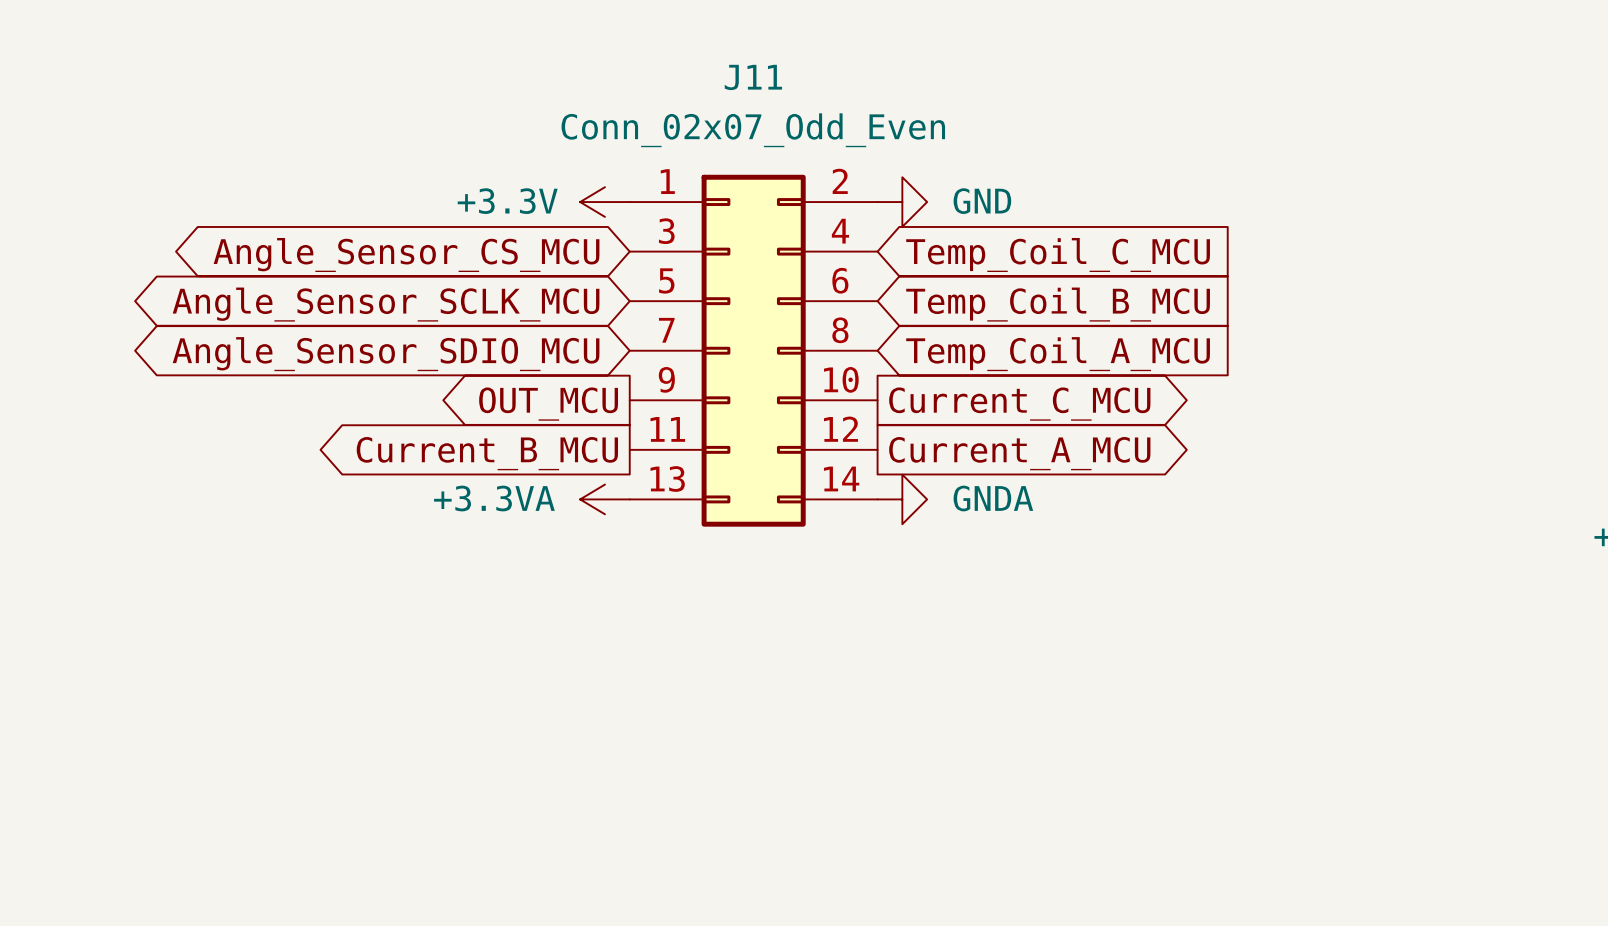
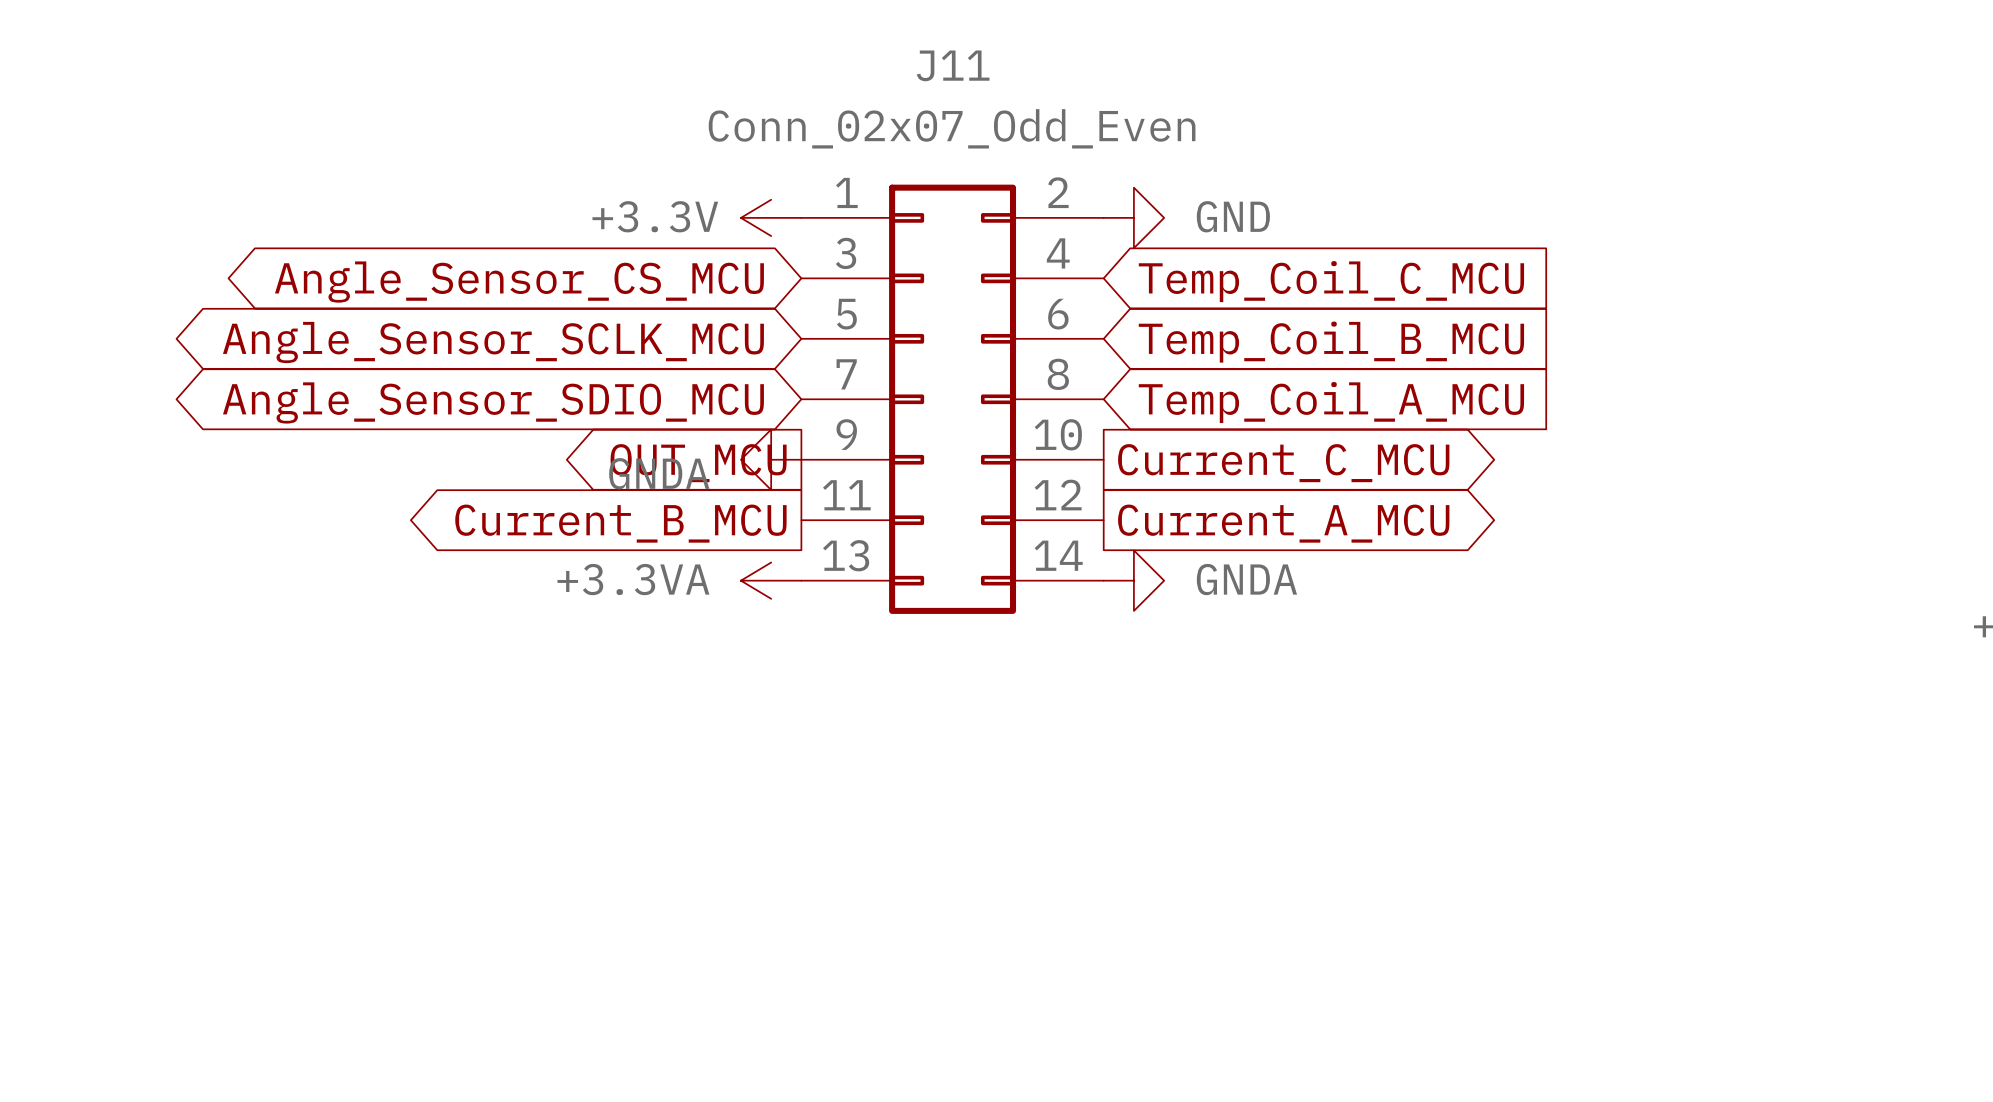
power symbol: none -> GNDA (771, 459)

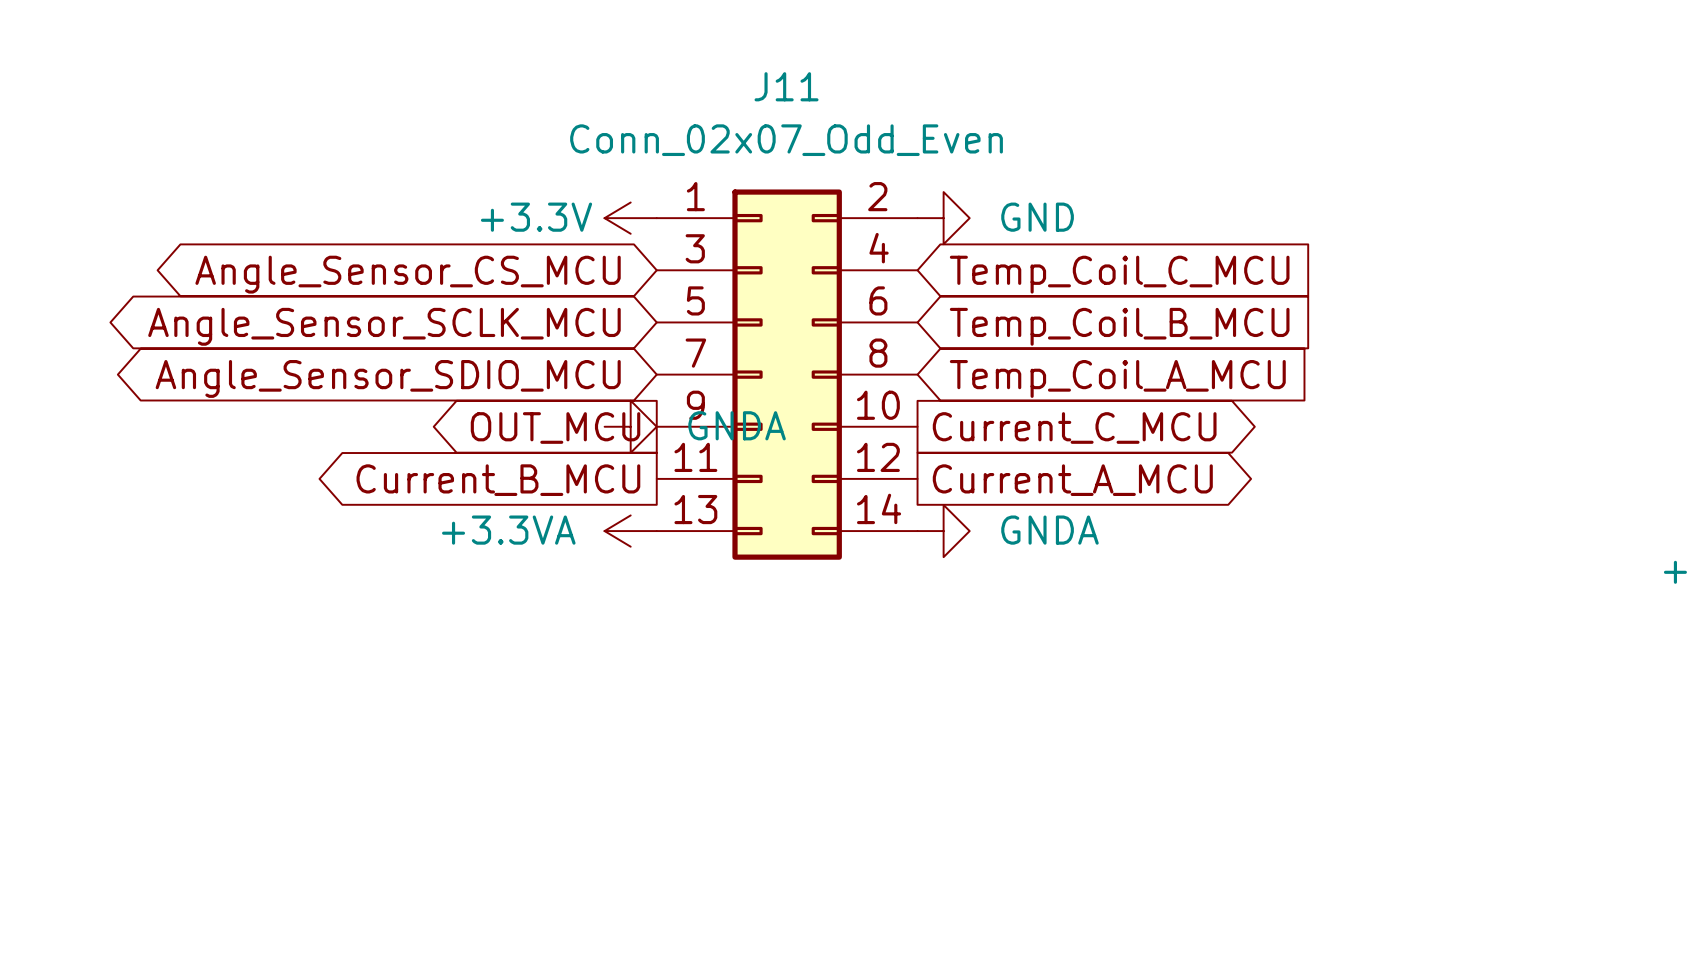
power symbol rotation: 0° (771, 459) -> 180° (630, 426)

